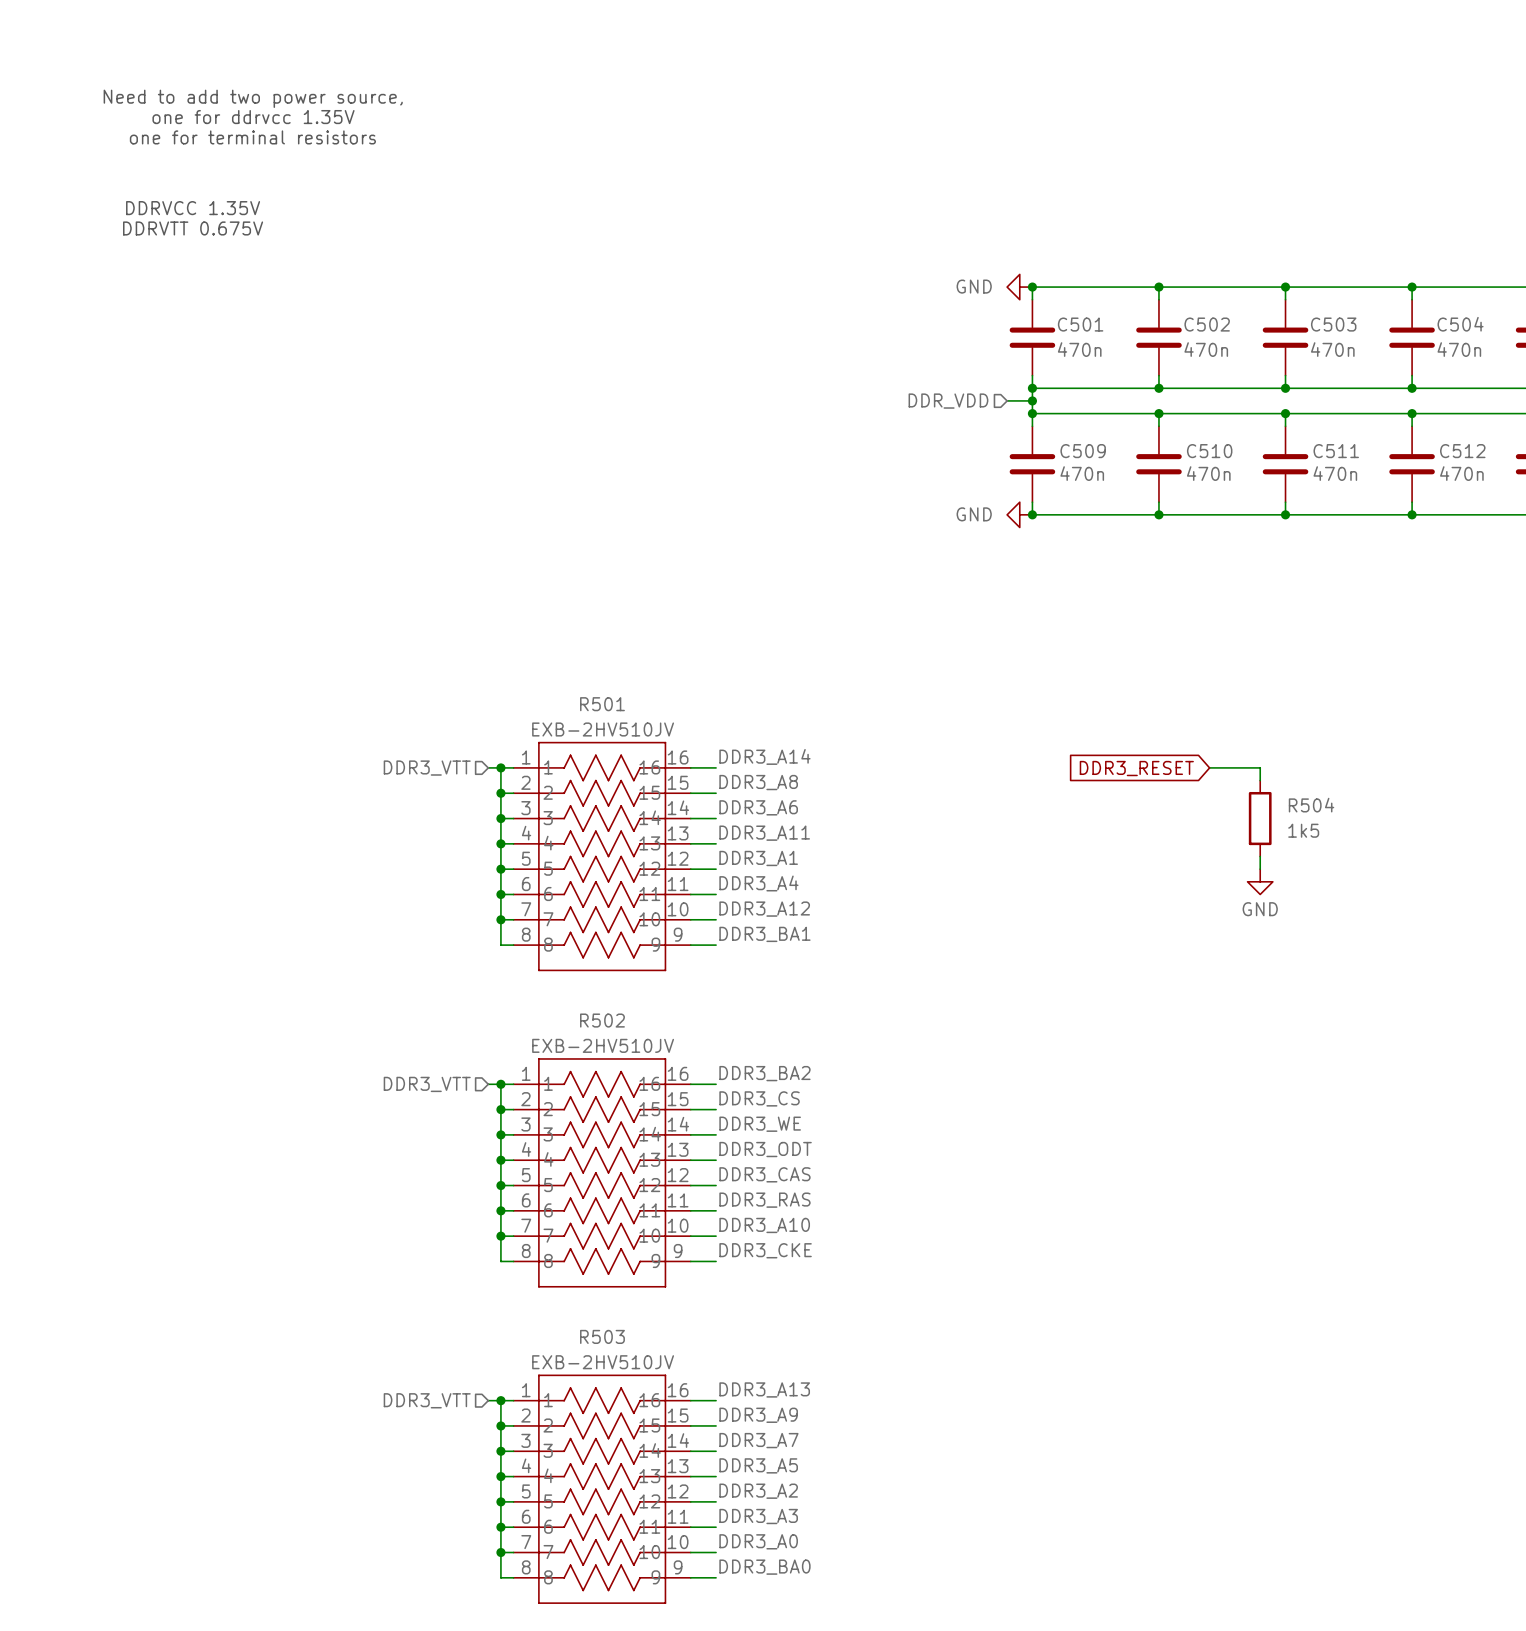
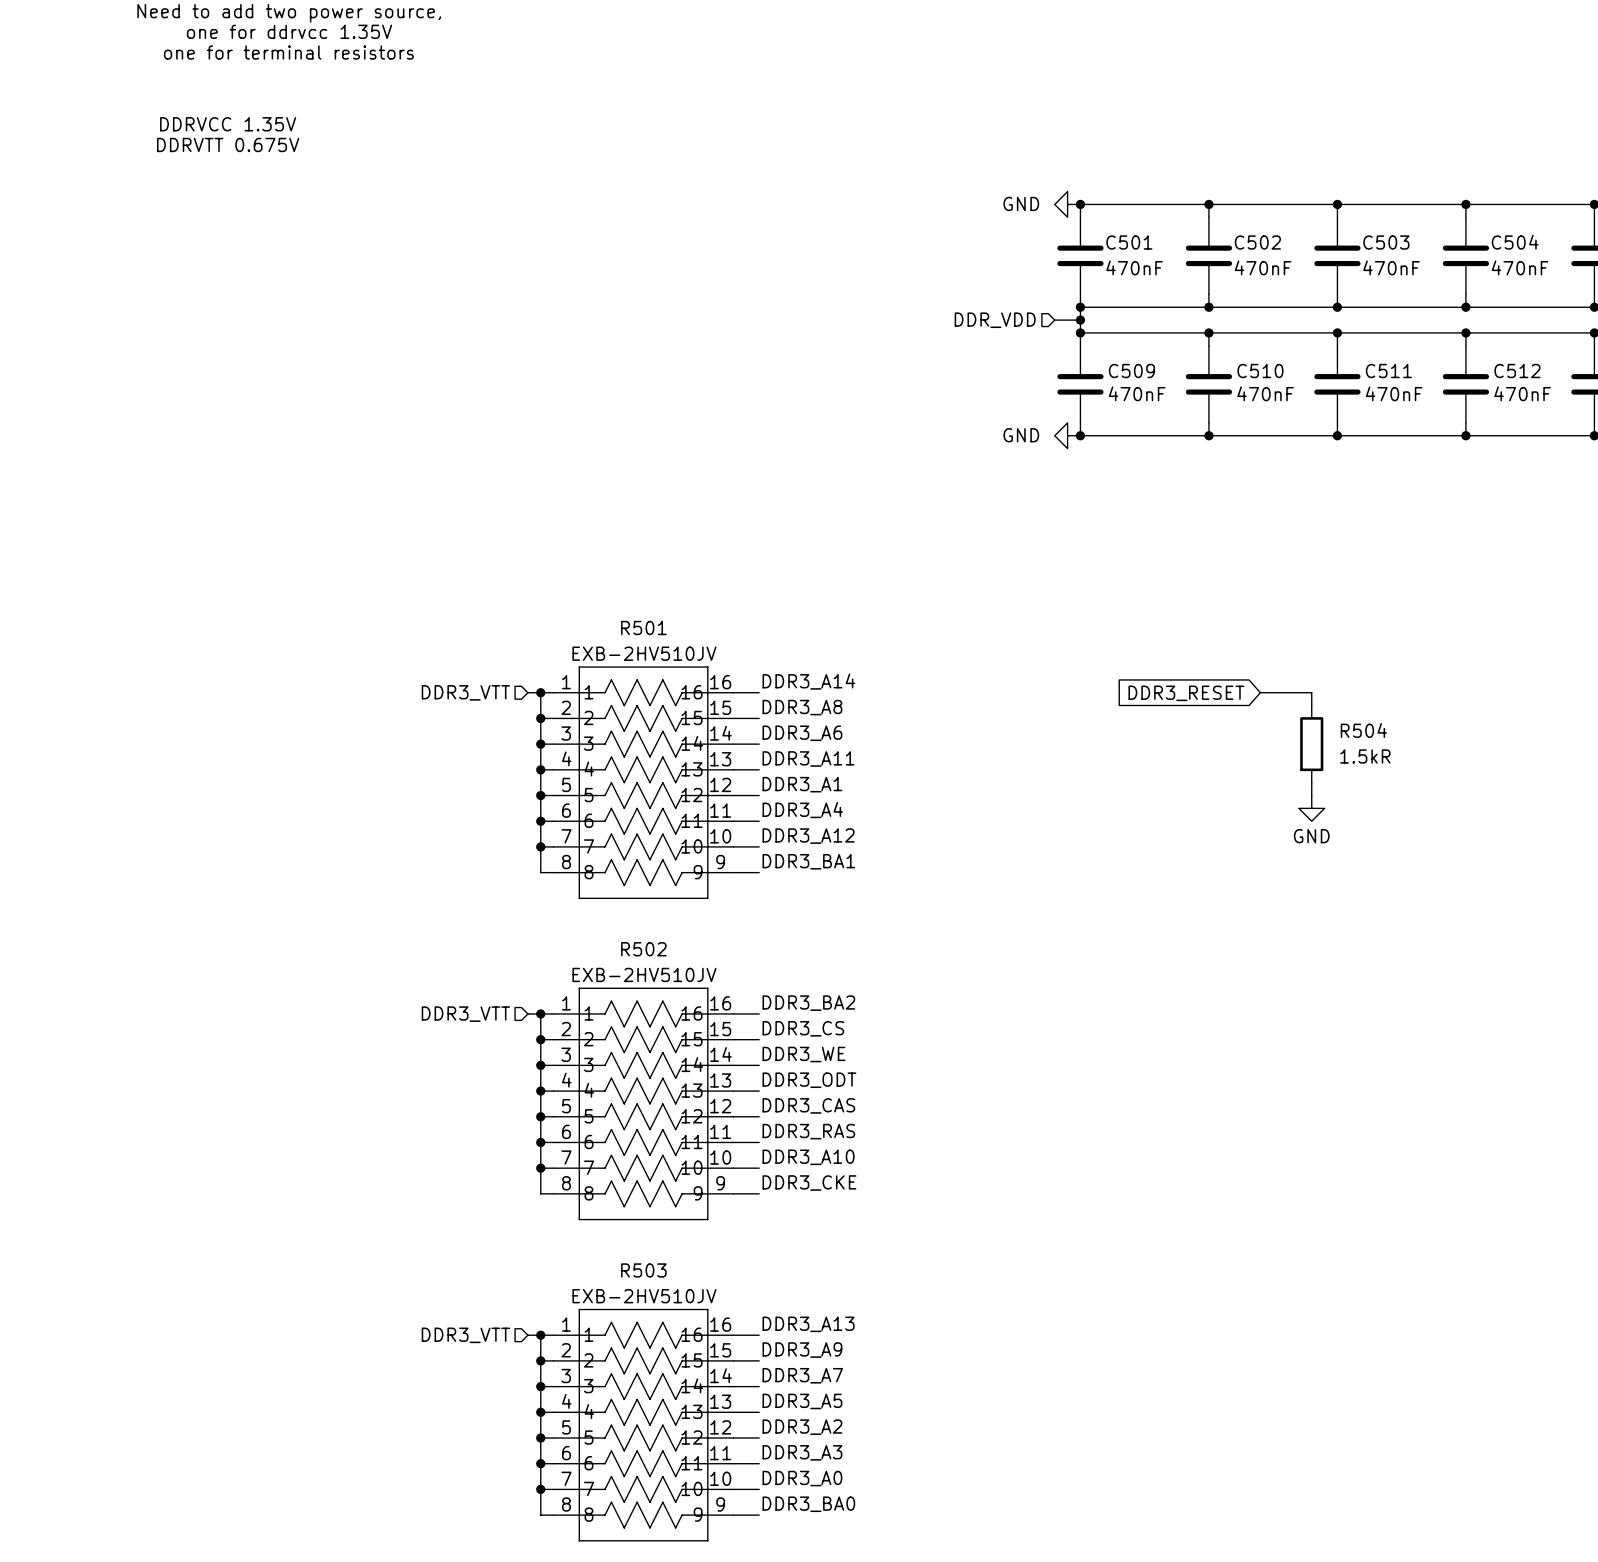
C501 value: 470n (1079, 349) -> 470nF (1134, 267)
C502 value: 470n (1206, 349) -> 470nF (1263, 267)
C503 value: 470n (1332, 349) -> 470nF (1391, 267)
C504 value: 470n (1459, 349) -> 470nF (1520, 267)
C509 value: 470n (1082, 473) -> 470nF (1137, 393)
C510 value: 470n (1208, 473) -> 470nF (1265, 393)
C511 value: 470n (1335, 473) -> 470nF (1394, 393)
C512 value: 470n (1461, 473) -> 470nF (1522, 393)
R504 value: 1k5 (1303, 830) -> 1.5kR (1365, 756)

